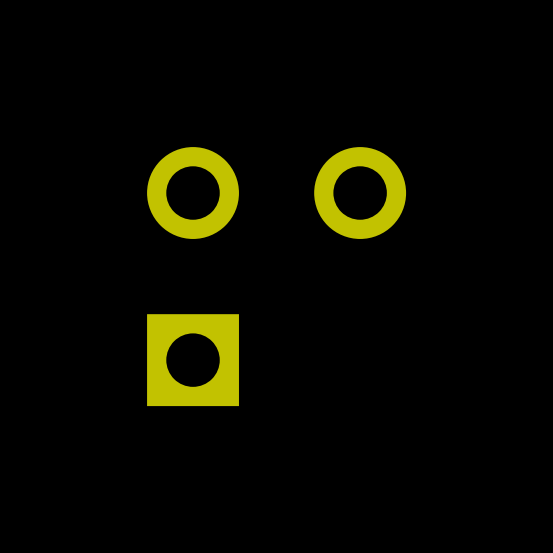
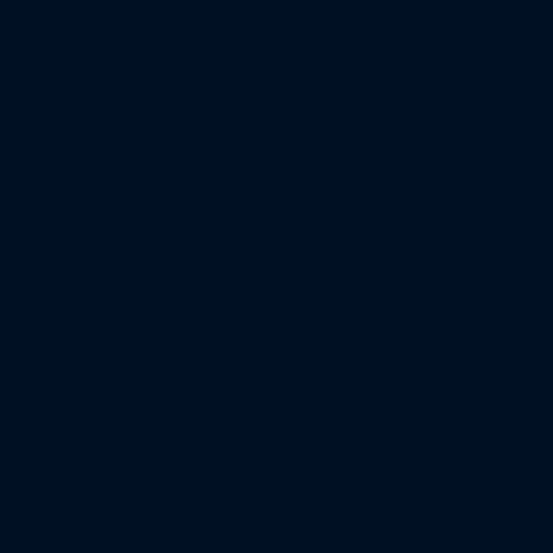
part: (276, 276) -> none

